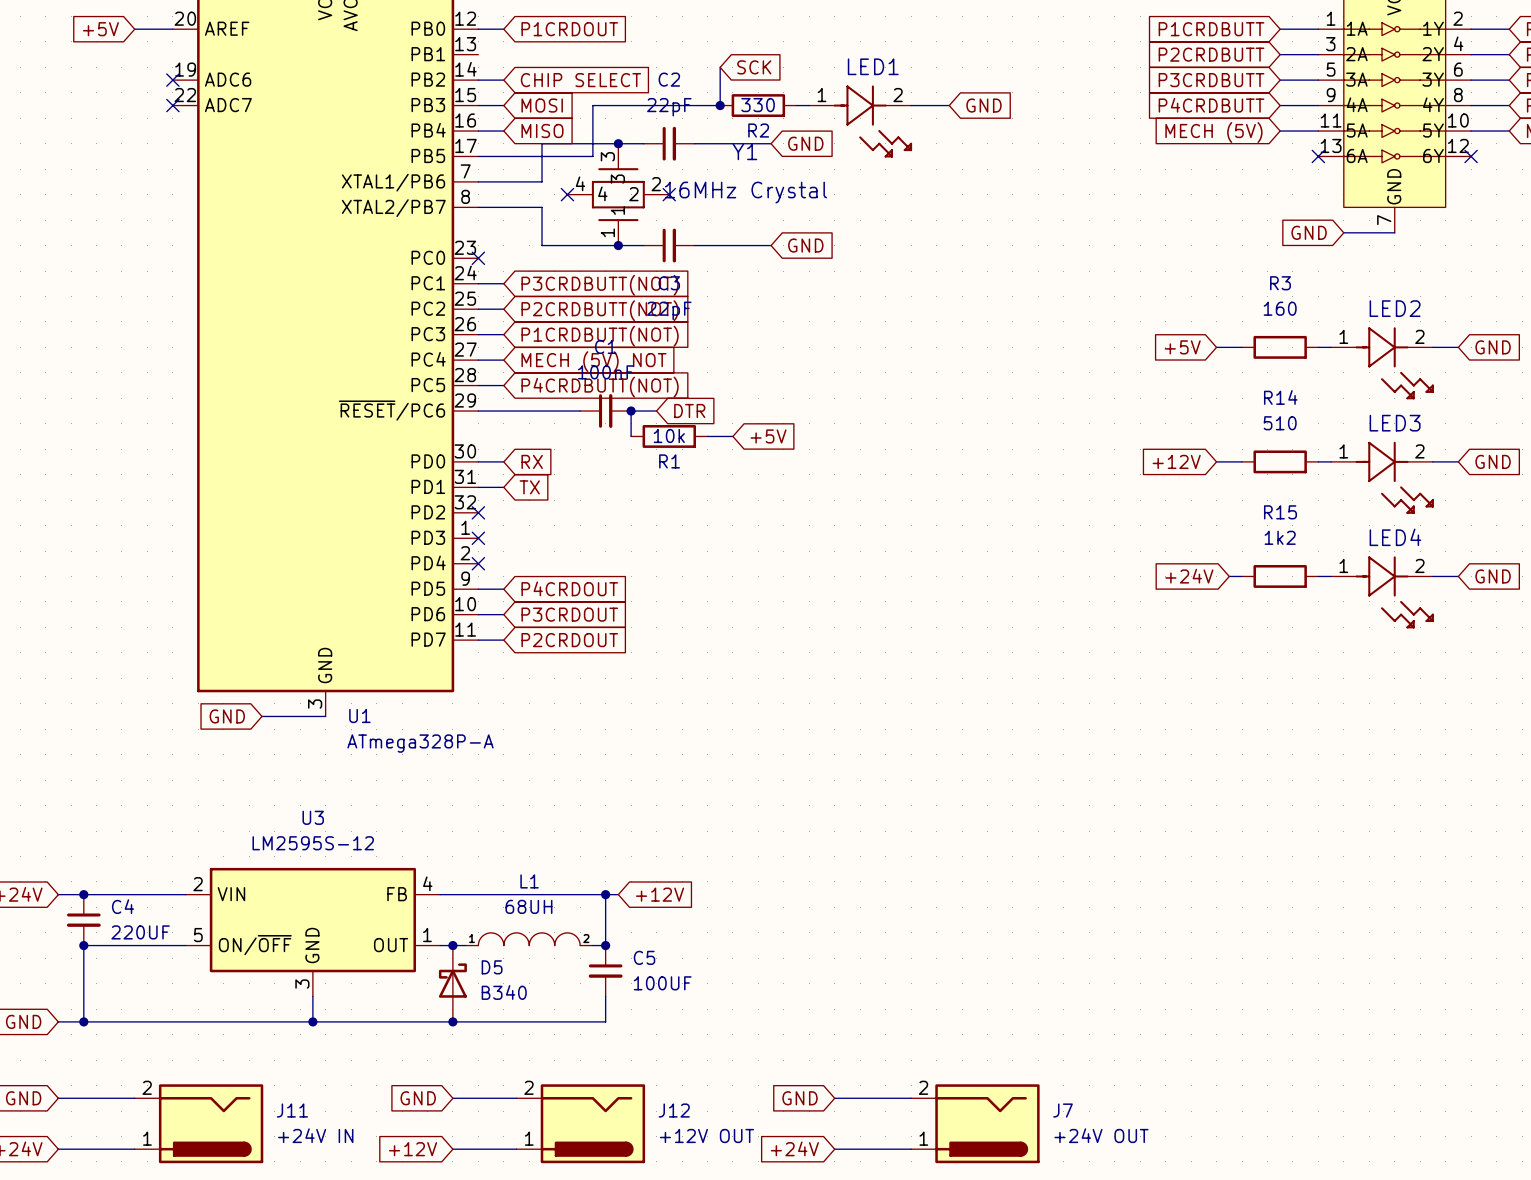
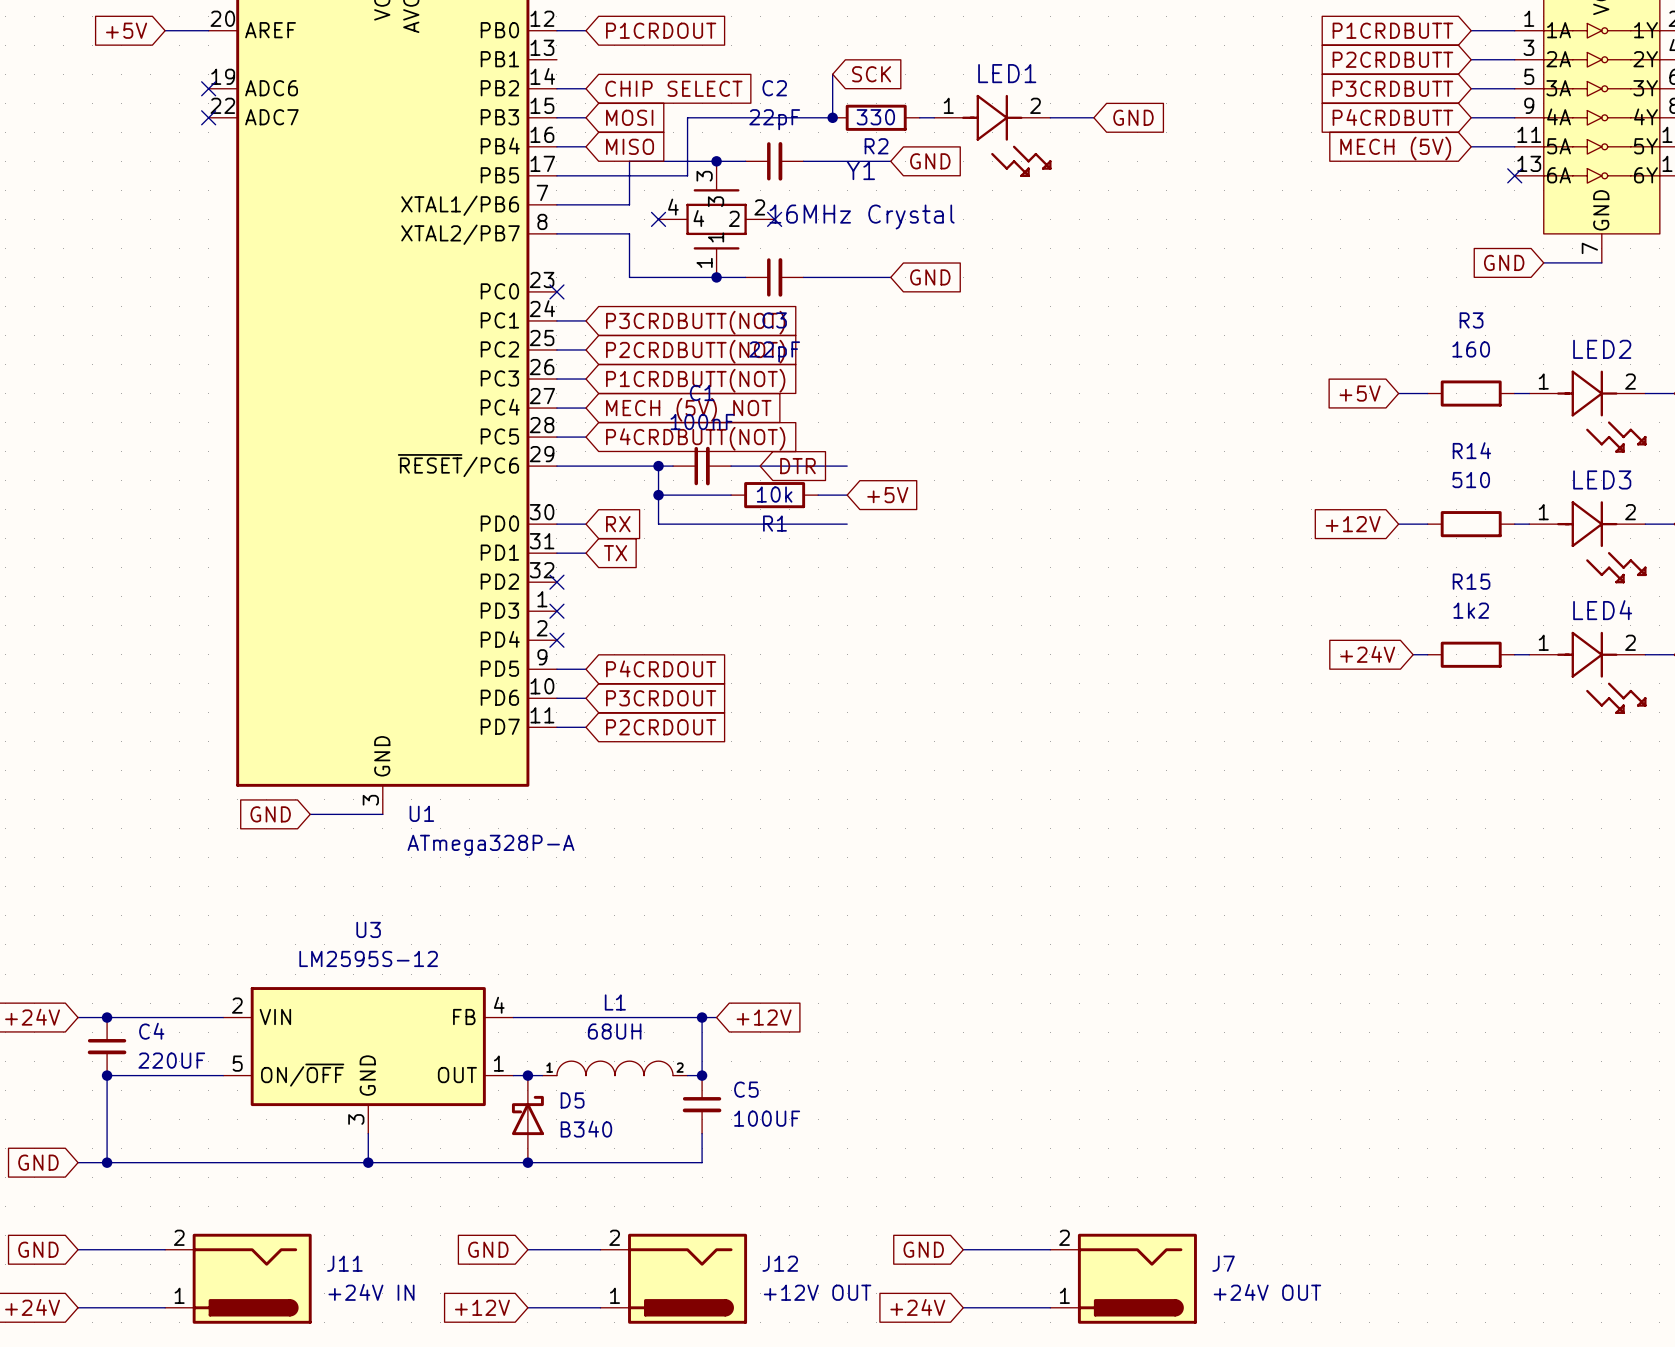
wire: none -> (658, 466) (658, 524) (847, 524)
junction: none -> (658, 466)
wire: (631, 411) (631, 436) -> (658, 495) (731, 495)
junction: (631, 411) -> none
wire: none -> (760, 466) (847, 466)
junction: none -> (658, 495)

